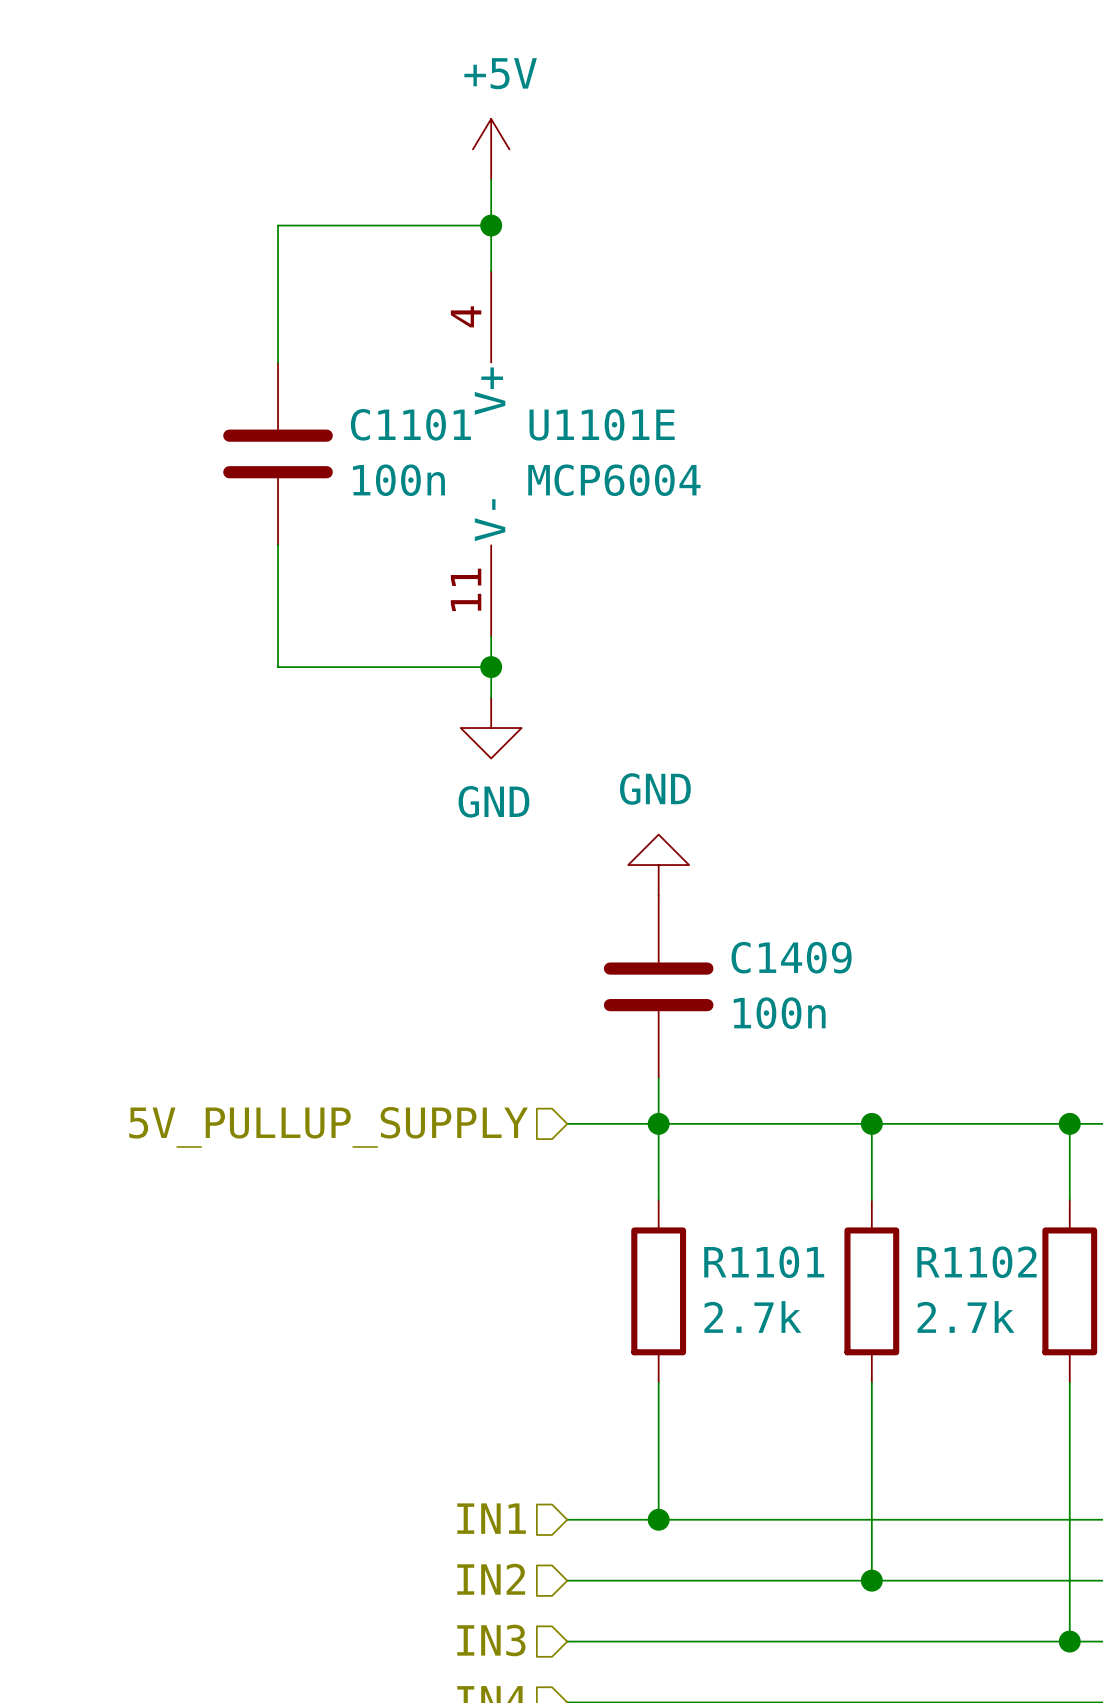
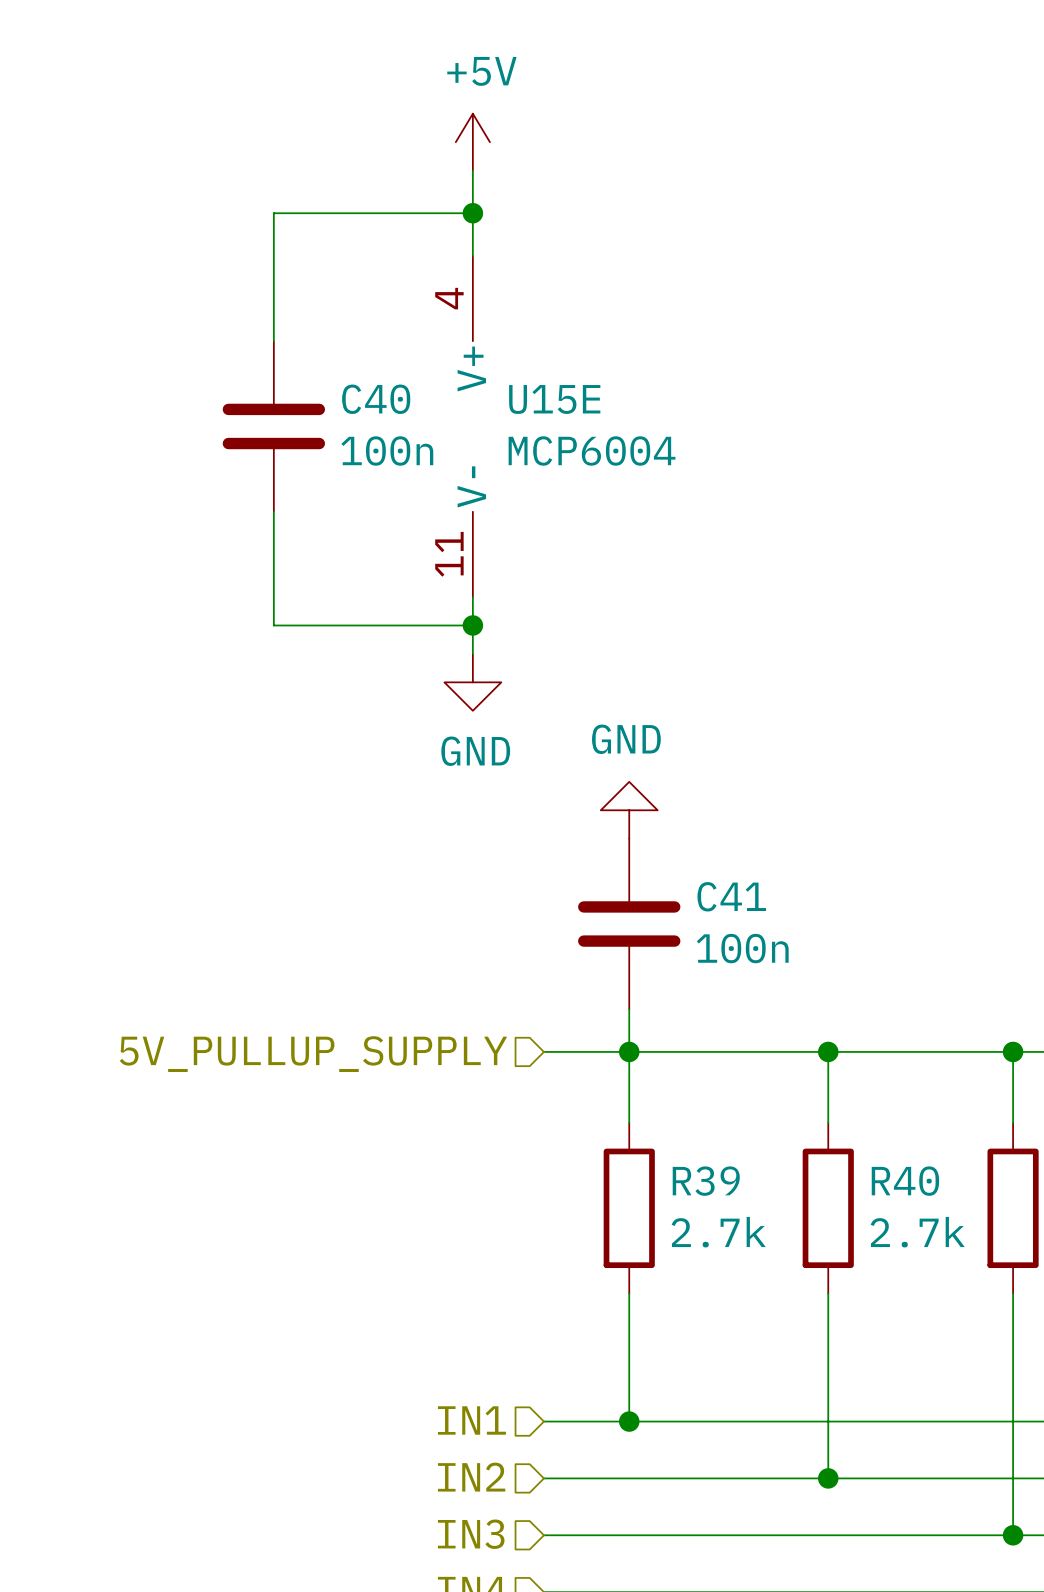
C1101 name: C1101 (410, 424) -> C40 (376, 399)
U1101E name: U1101E (602, 424) -> U15E (554, 399)
C1409 name: C1409 (791, 957) -> C41 (731, 896)
R1101 name: R1101 (764, 1262) -> R39 (706, 1181)
R1102 name: R1102 (977, 1262) -> R40 (905, 1181)

